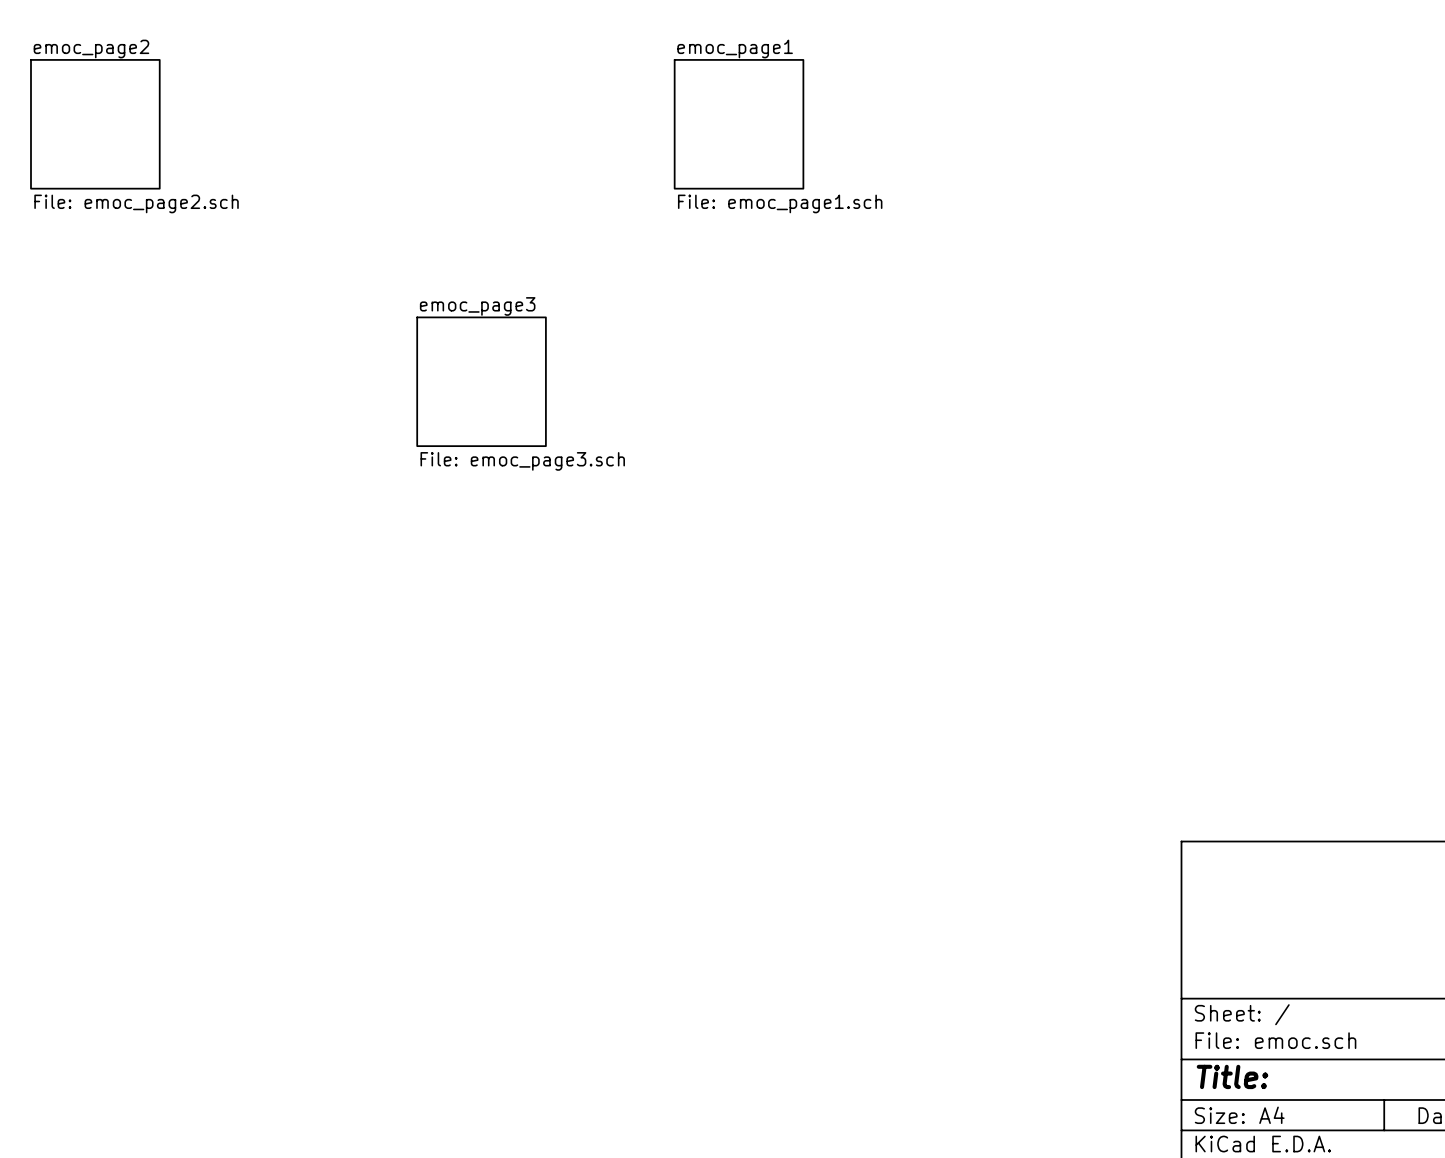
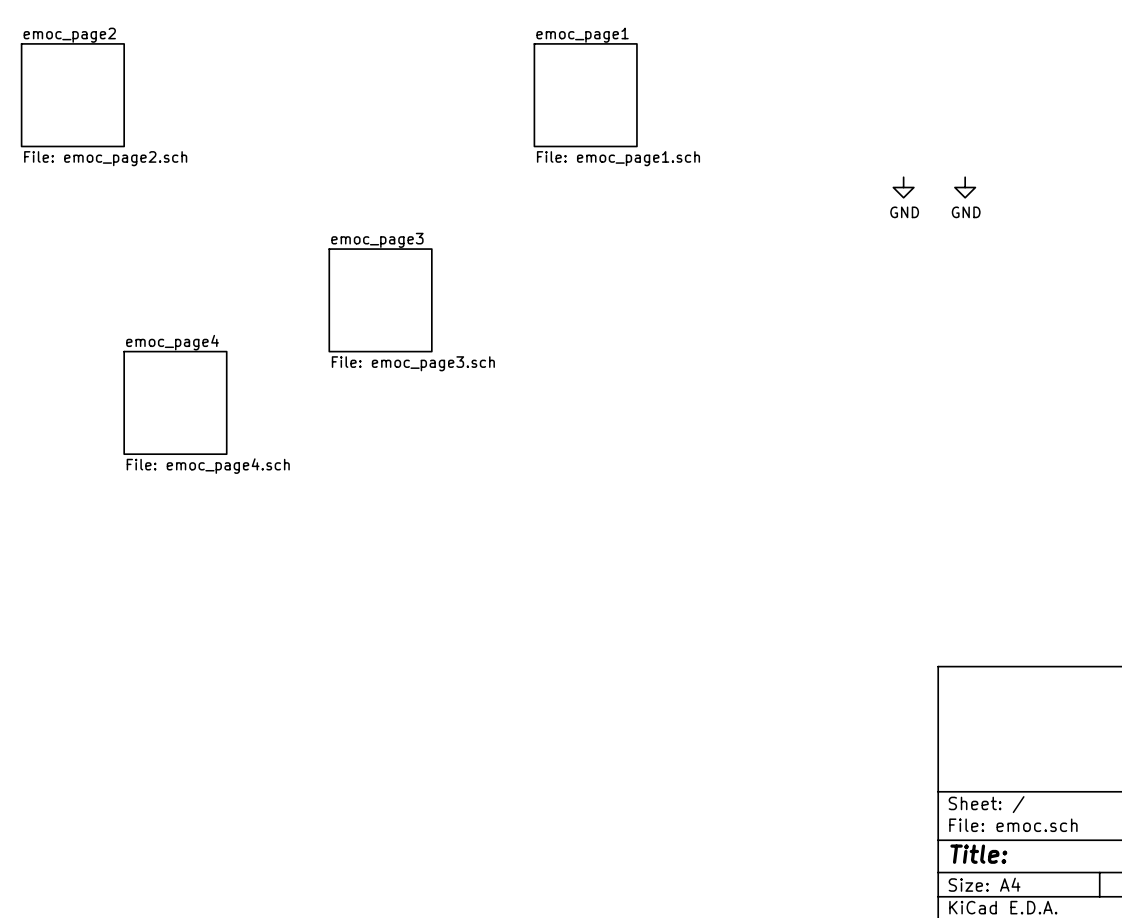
power symbol: none -> GND (903, 187)
power symbol: none -> GND (965, 187)
sheet emoc_page4: none -> File: emoc_page4.sch (175, 402)

